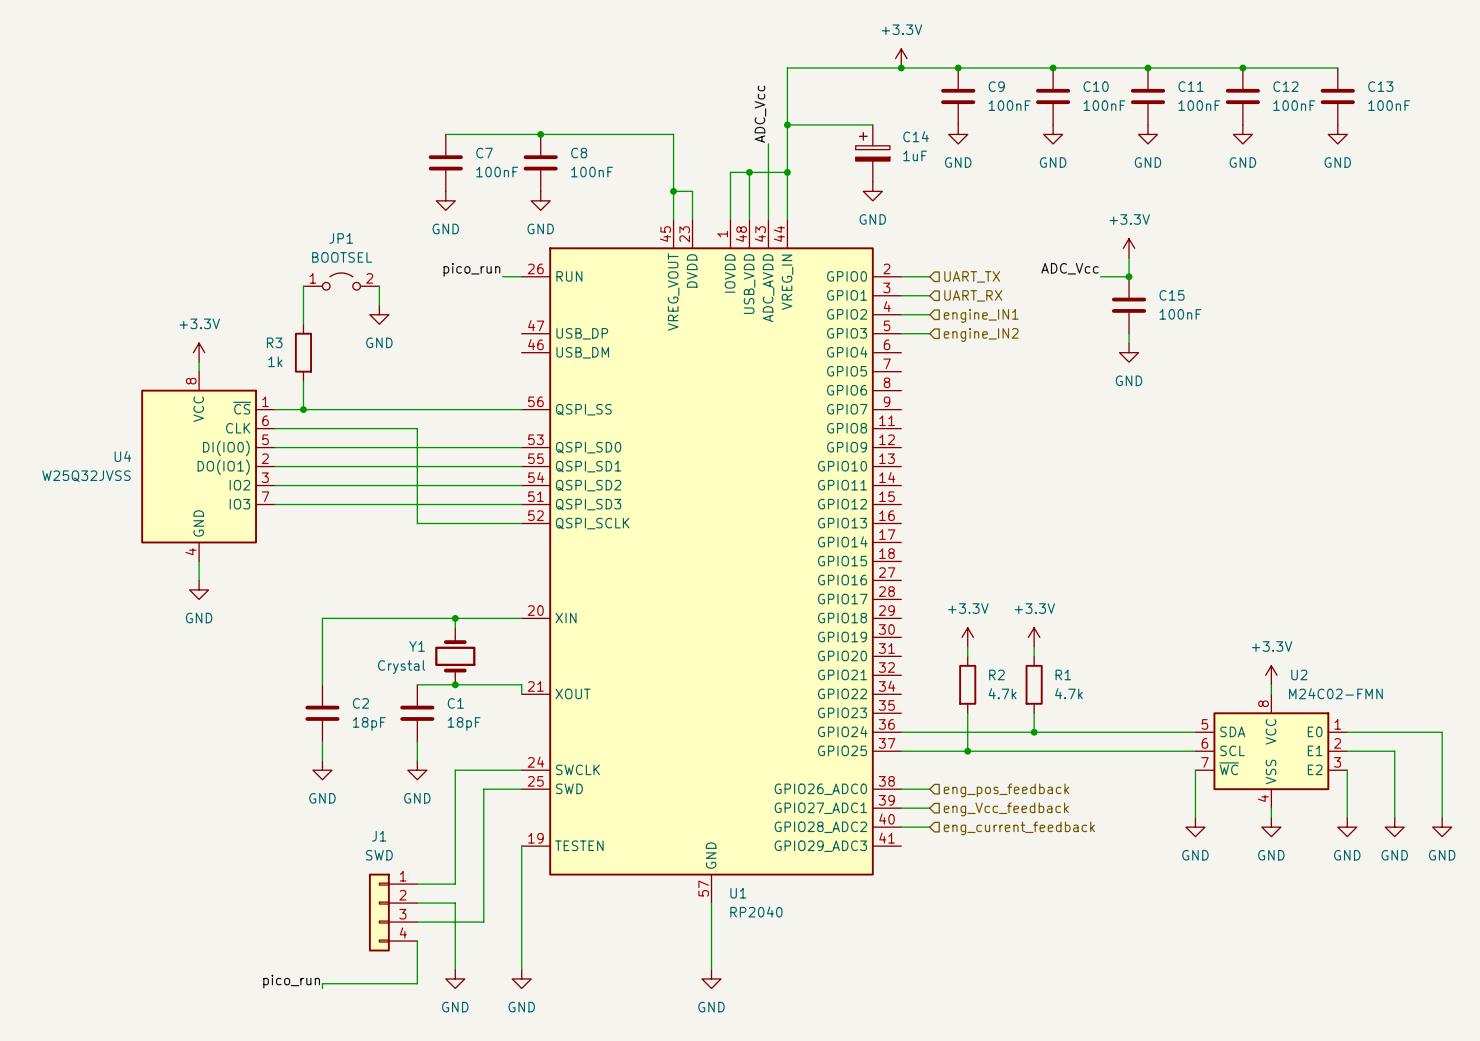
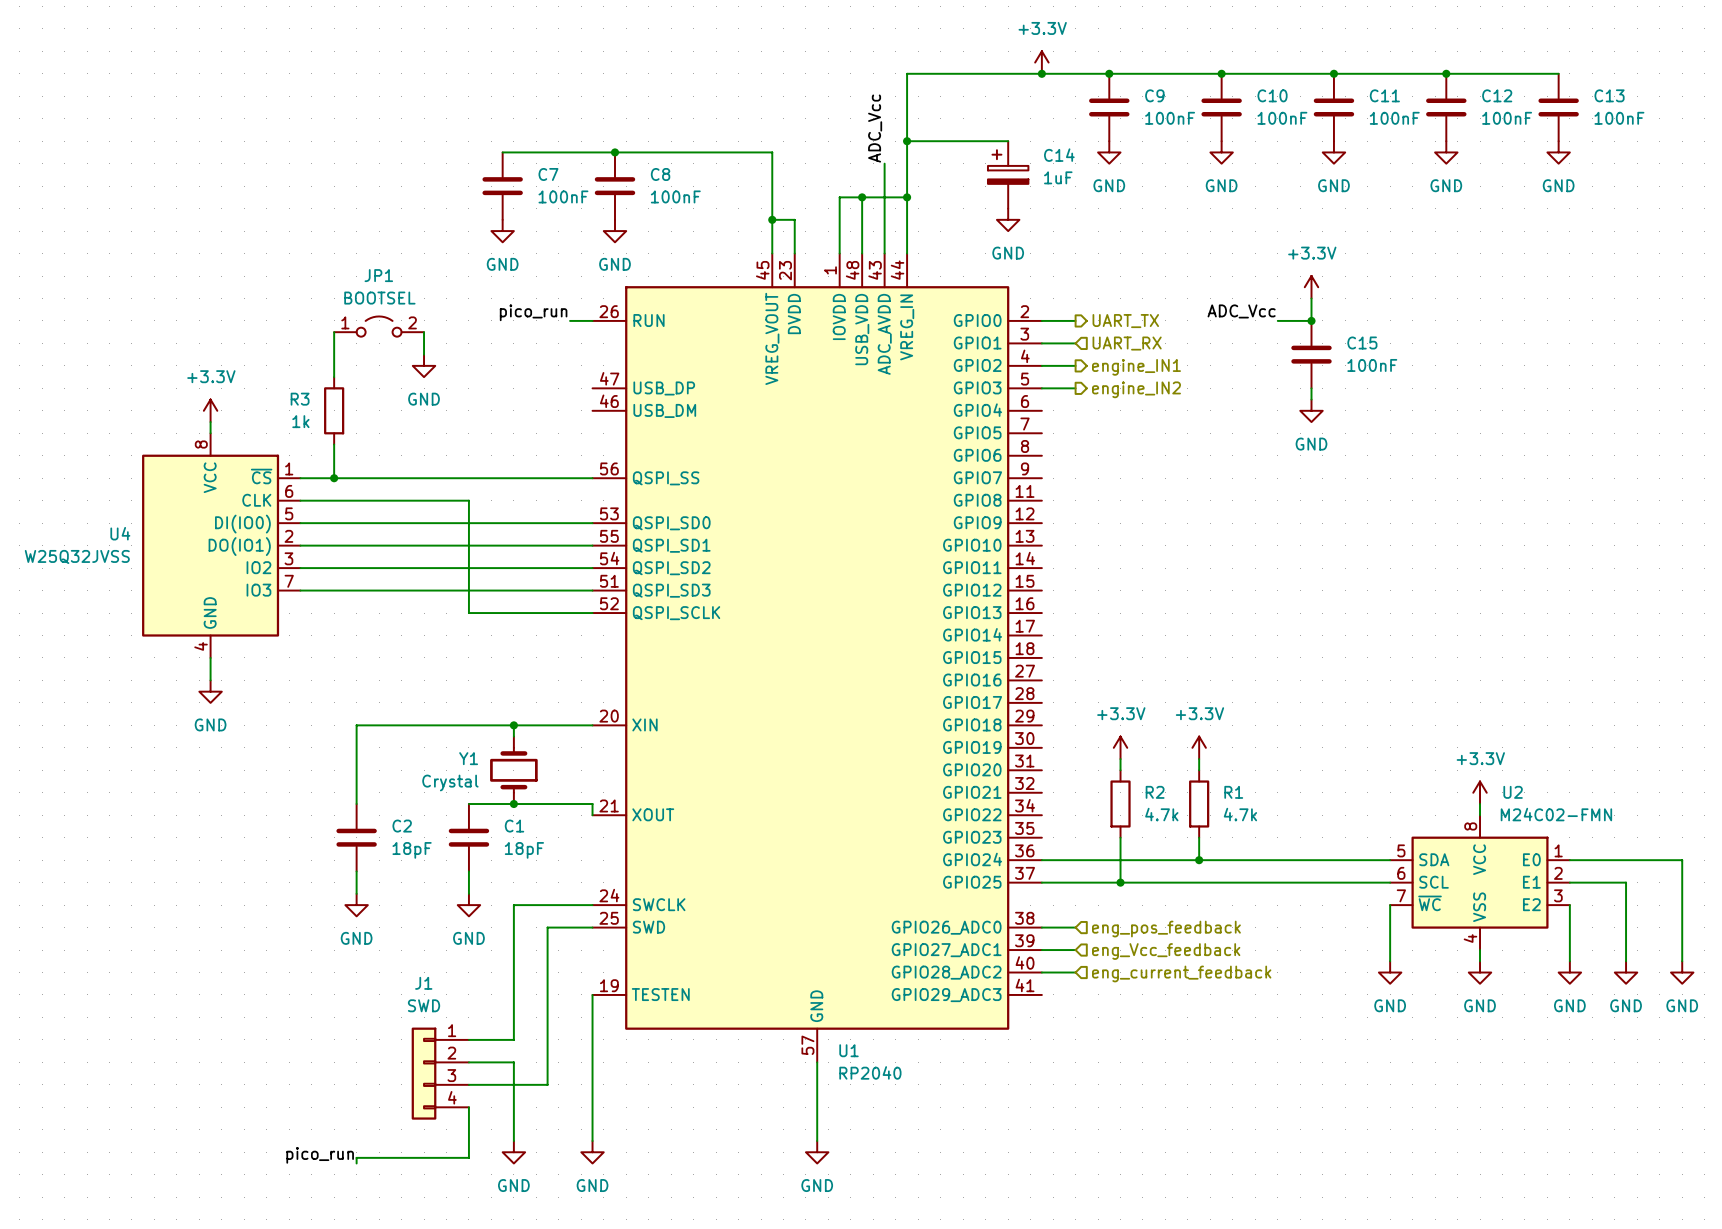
hierarchical label shape: input (972, 276) -> output (1125, 321)
hierarchical label shape: input (981, 315) -> output (1136, 367)
hierarchical label shape: input (981, 334) -> output (1136, 389)

